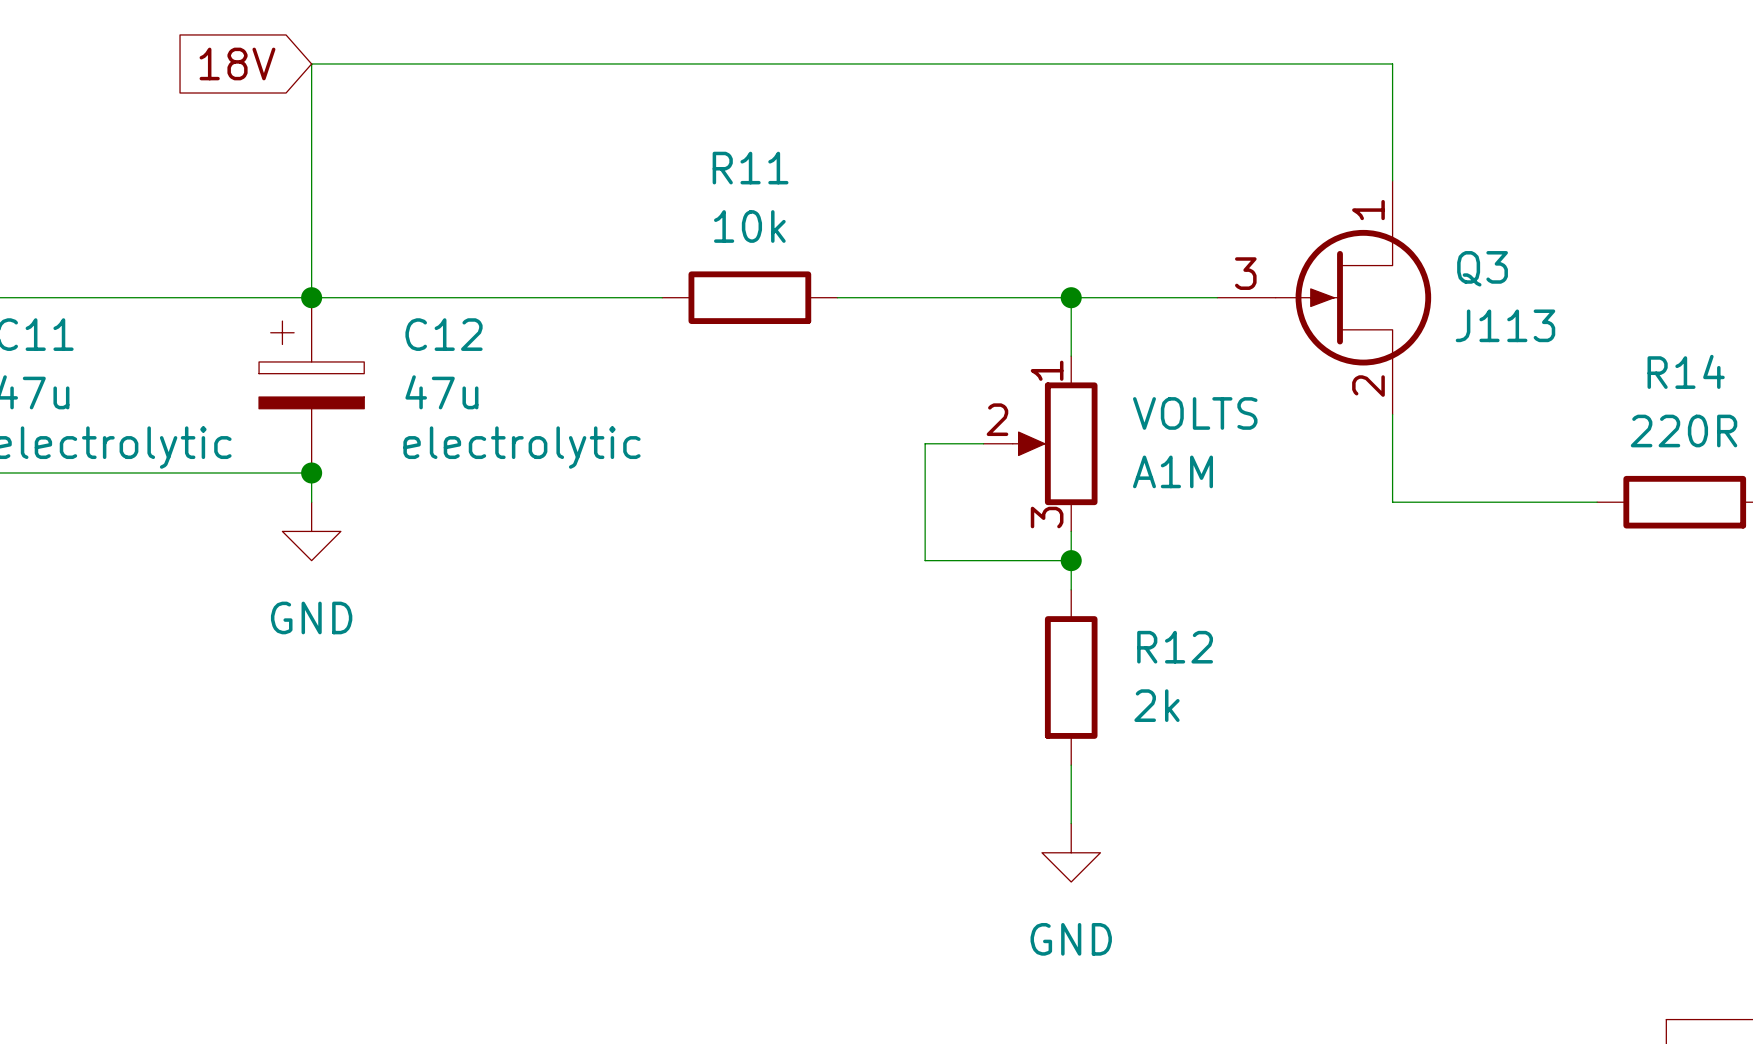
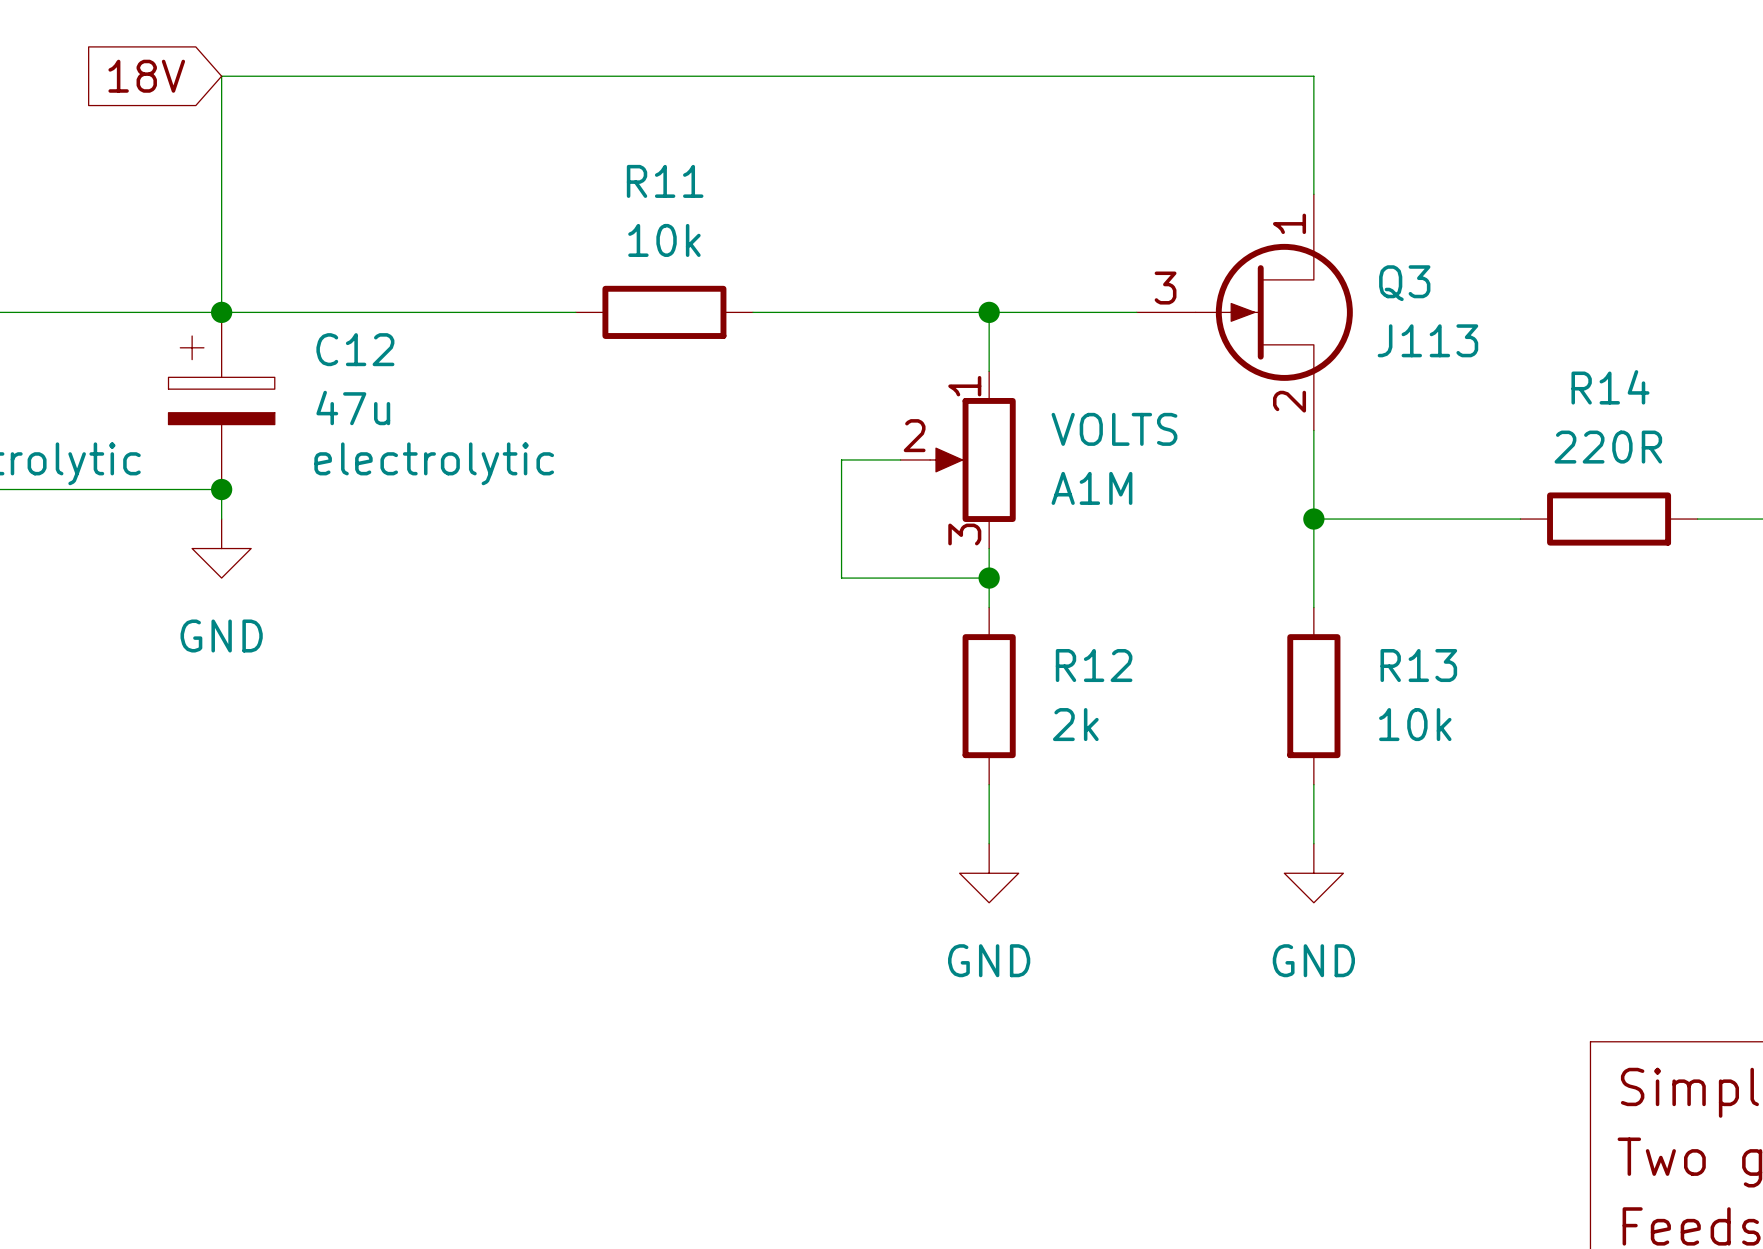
wire: none -> (1313, 519) (1313, 607)
junction: none -> (1313, 519)
R13: none -> 10k (1313, 696)
wire: none -> (1313, 784) (1313, 843)
power symbol: none -> GND (1313, 873)

